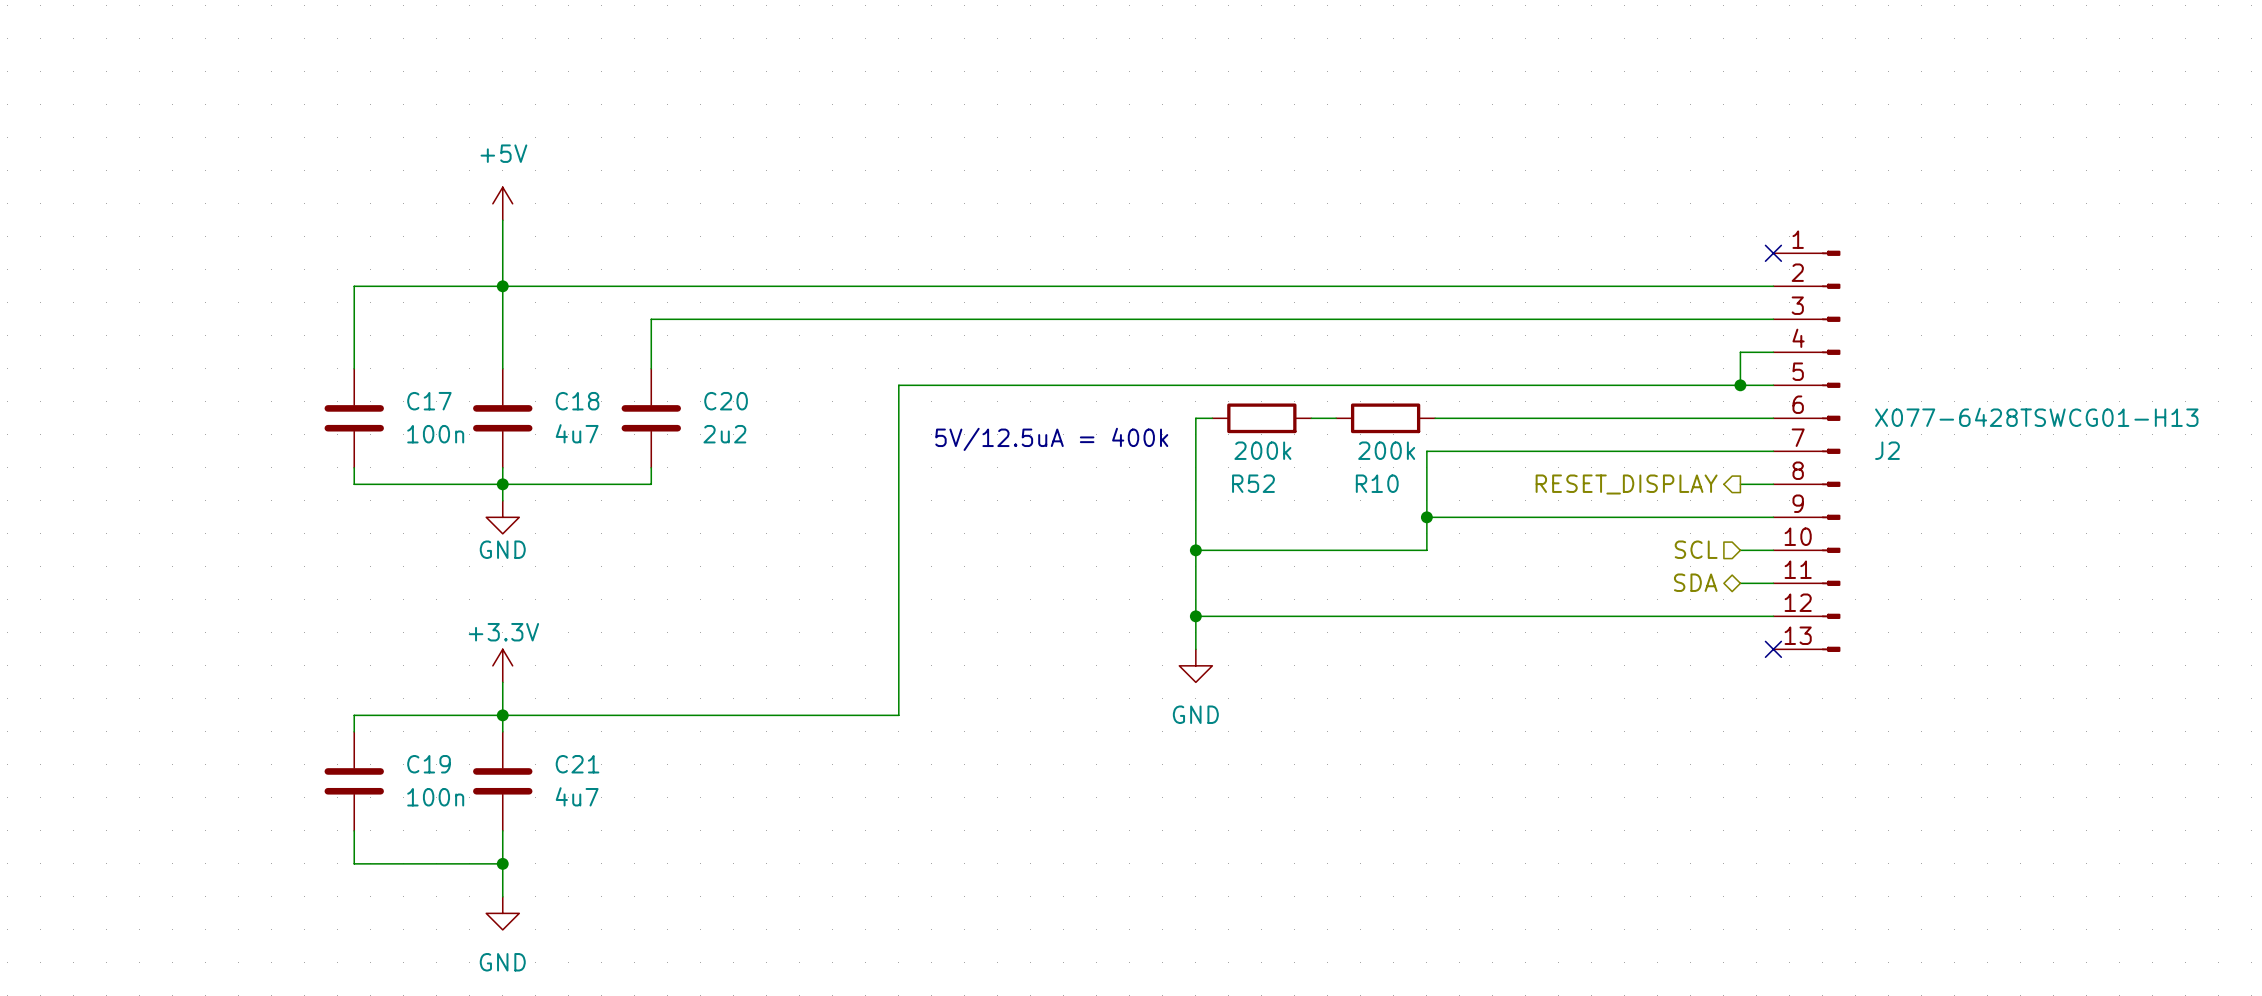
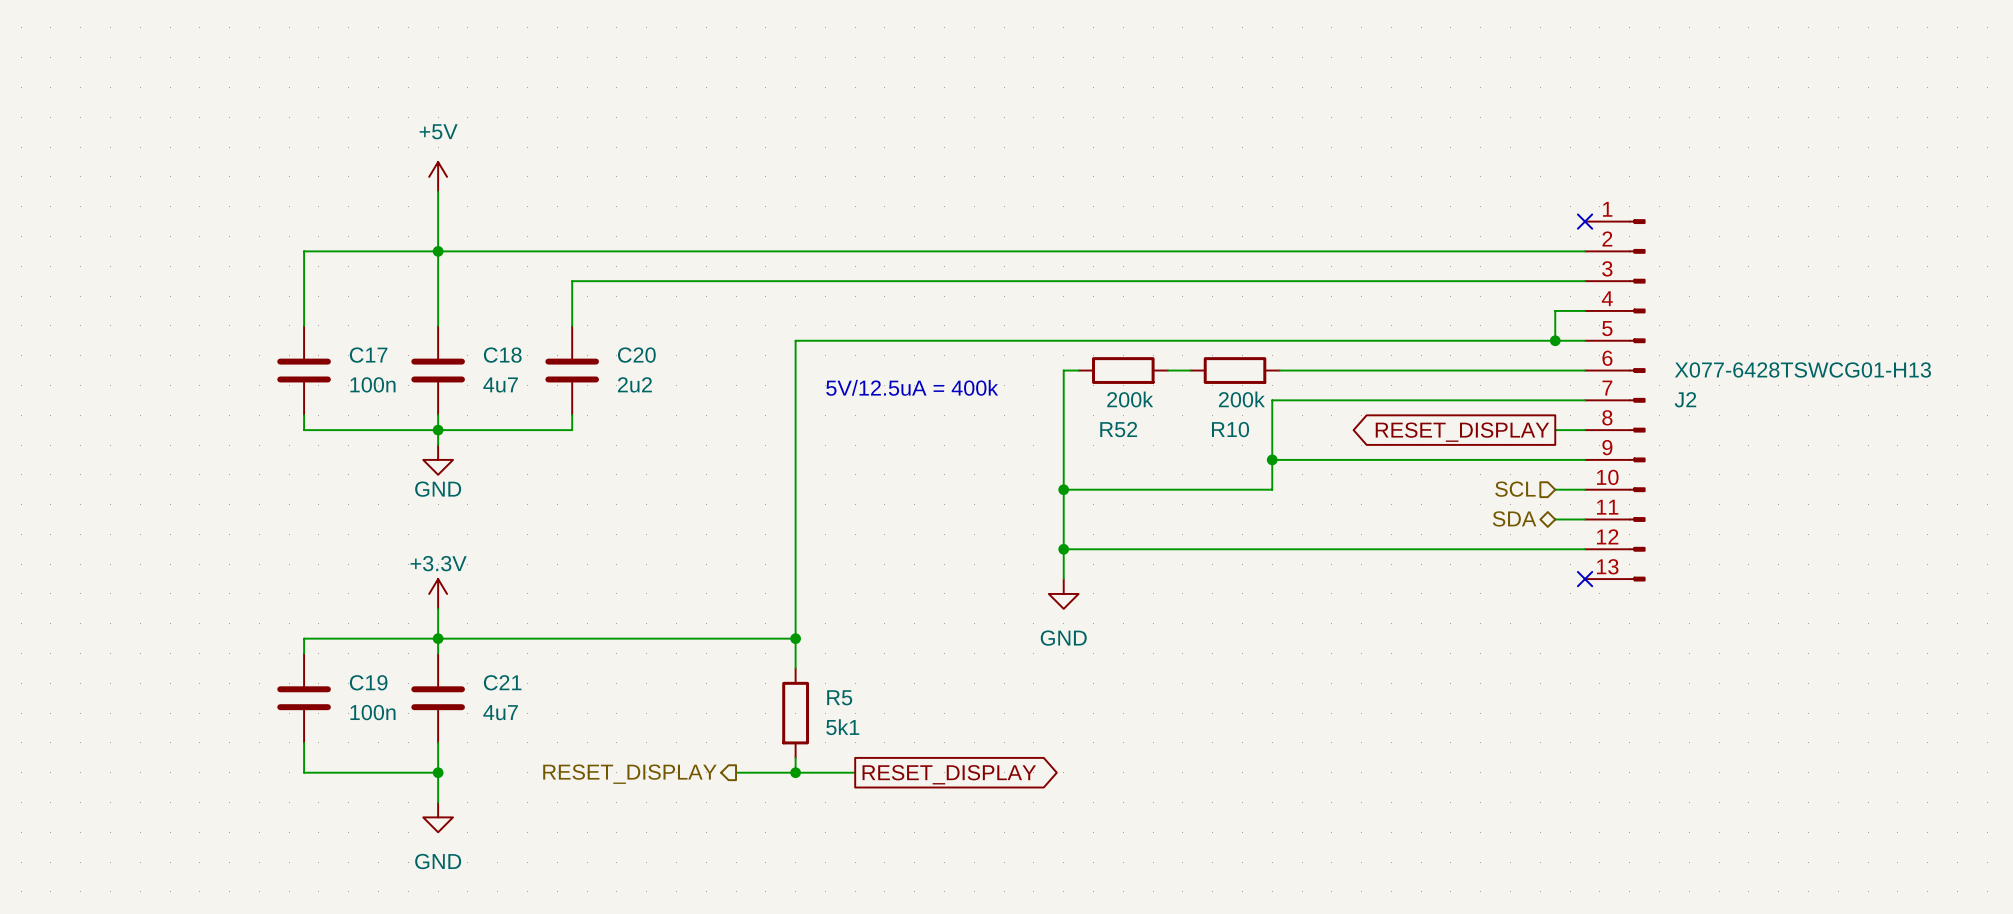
hierarchical label: RESET_DISPLAY (1626, 484) -> none
global label: none -> RESET_DISPLAY (1462, 432)
wire: none -> (795, 638) (795, 668)
junction: none -> (795, 638)
R5: none -> 5k1 (795, 713)
wire: none -> (795, 757) (795, 772)
wire: none -> (736, 772) (855, 772)
junction: none -> (795, 772)
hierarchical label: none -> RESET_DISPLAY (629, 774)
global label: none -> RESET_DISPLAY (949, 774)

